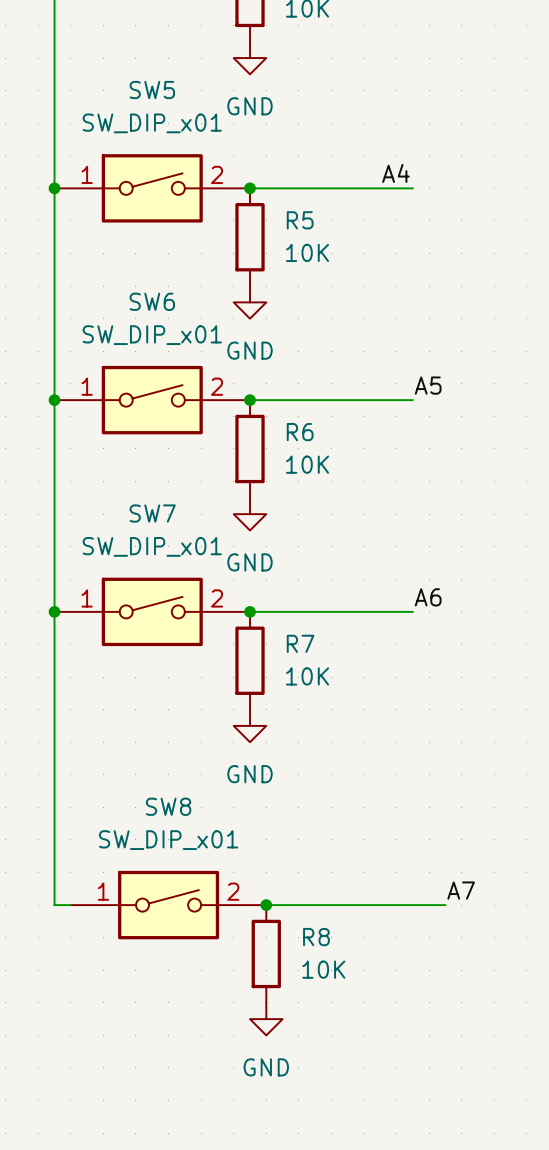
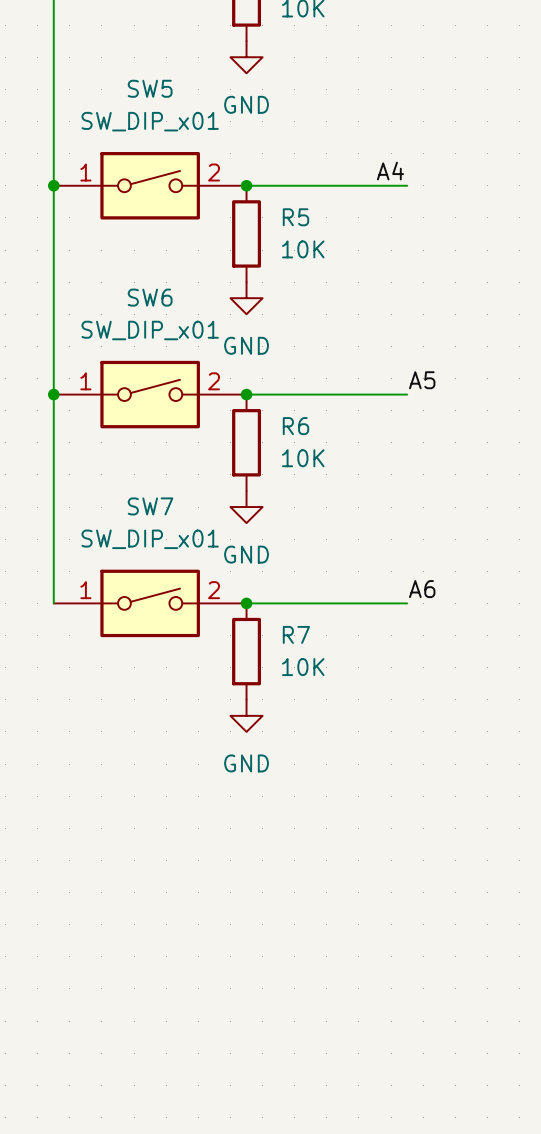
wire: (54, 611) (54, 905) (70, 905) -> none
junction: (54, 611) -> none
label: A7 (461, 890) -> none
SW8: SW_DIP_x01 (168, 905) -> none
wire: (266, 905) (445, 905) -> none
junction: (266, 905) -> none
R8: 10K (266, 953) -> none
power symbol: GND (266, 1019) -> none

